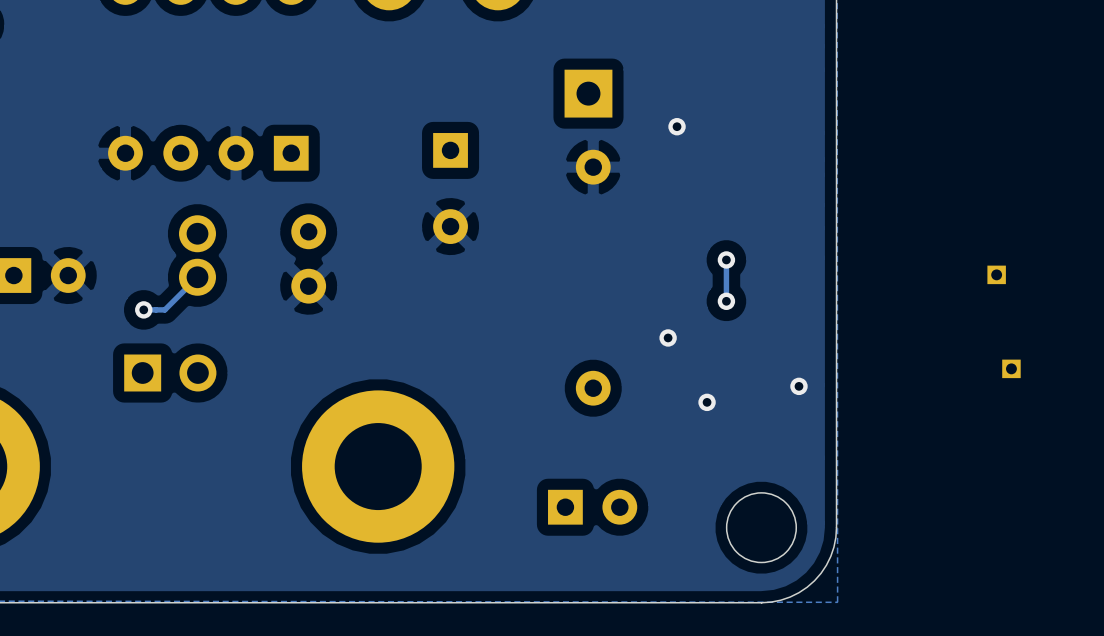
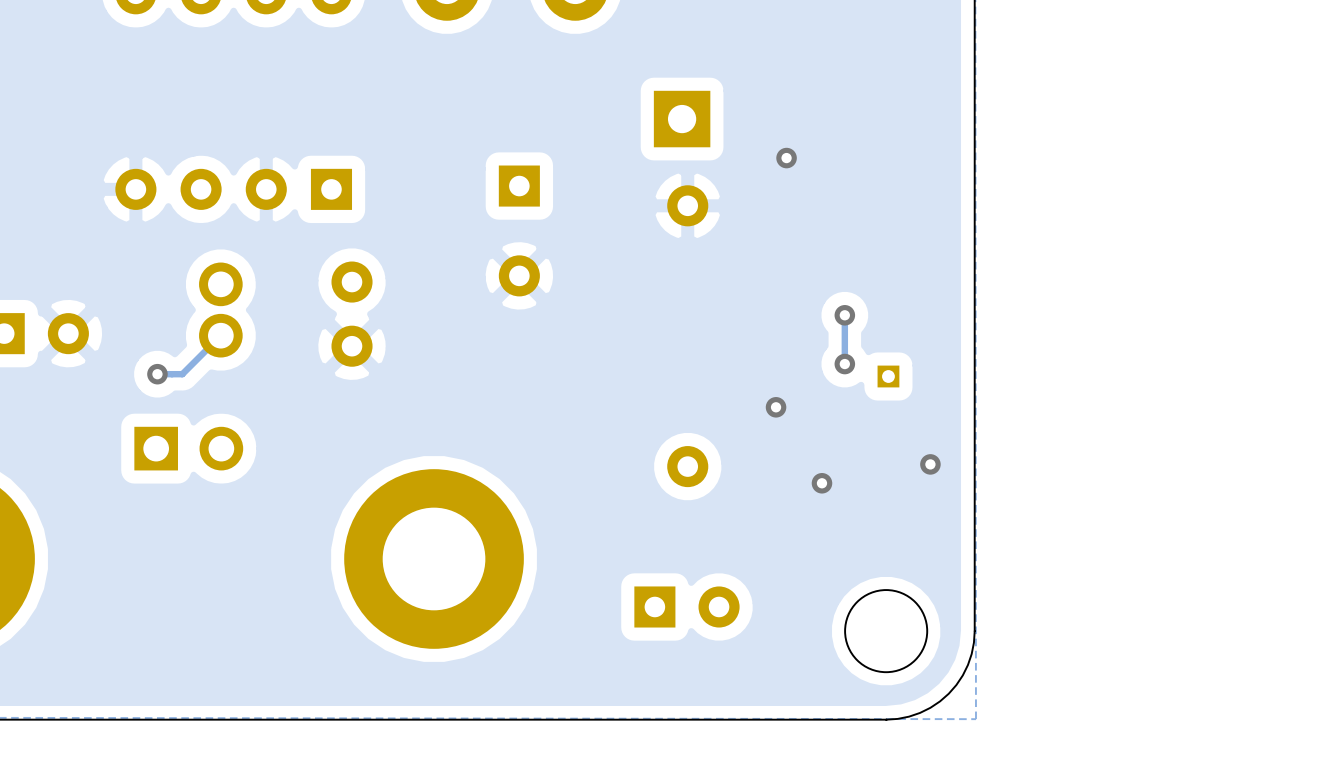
part: (996, 274) -> none
part: none -> (888, 376)
part: (1011, 368) -> none

